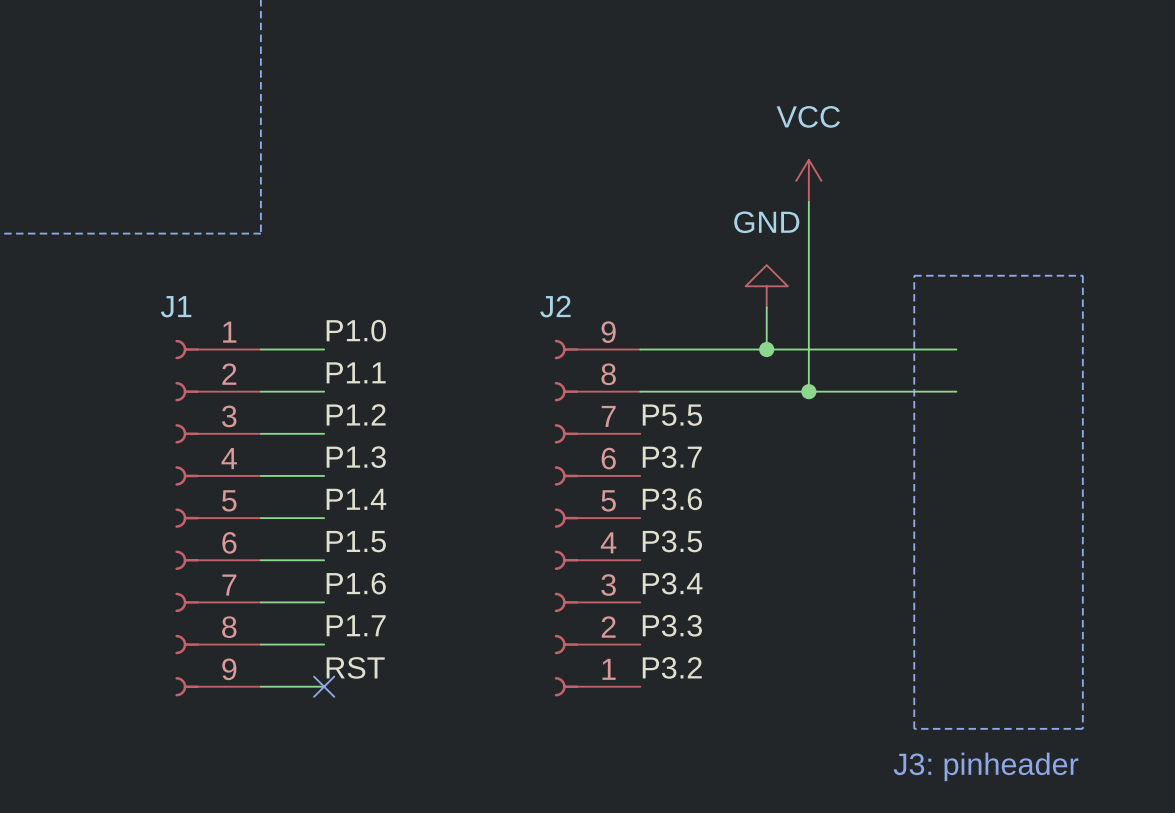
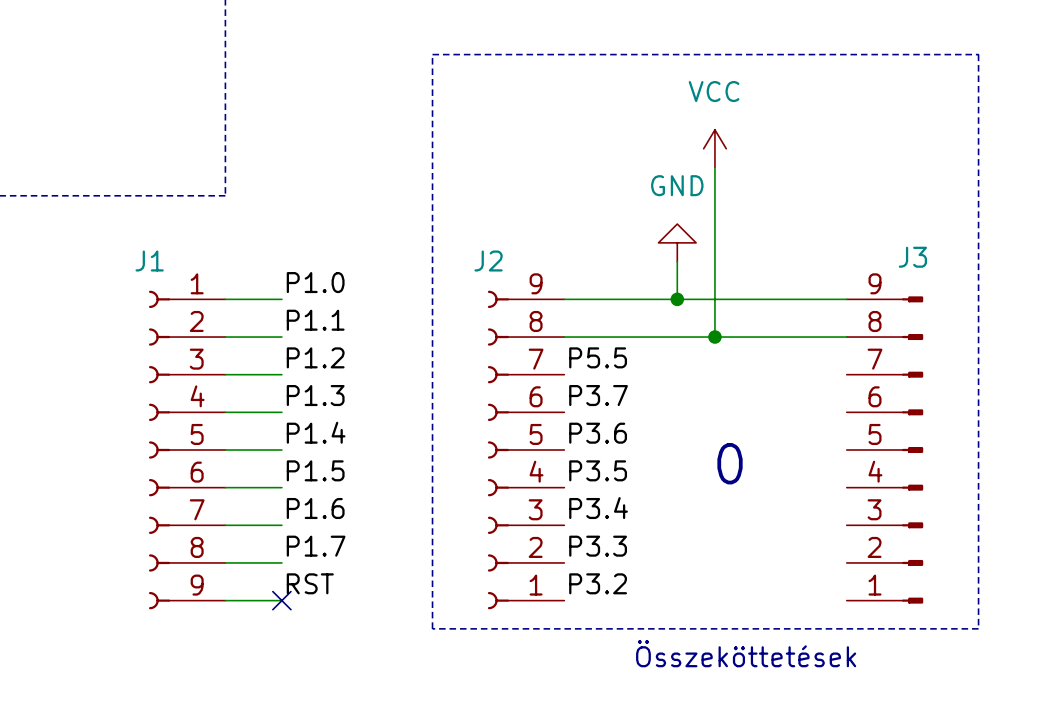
line: none -> (432, 54) (978, 54) (978, 628) (432, 628) (432, 54)
line: (914, 275) (1082, 275) (1082, 728) (914, 728) (914, 275) -> none
J3: none -> (884, 449)
text: none -> 0 (730, 463)
text: none -> Összeköttetések (746, 653)
text: J3: pinheader (985, 766) -> none

